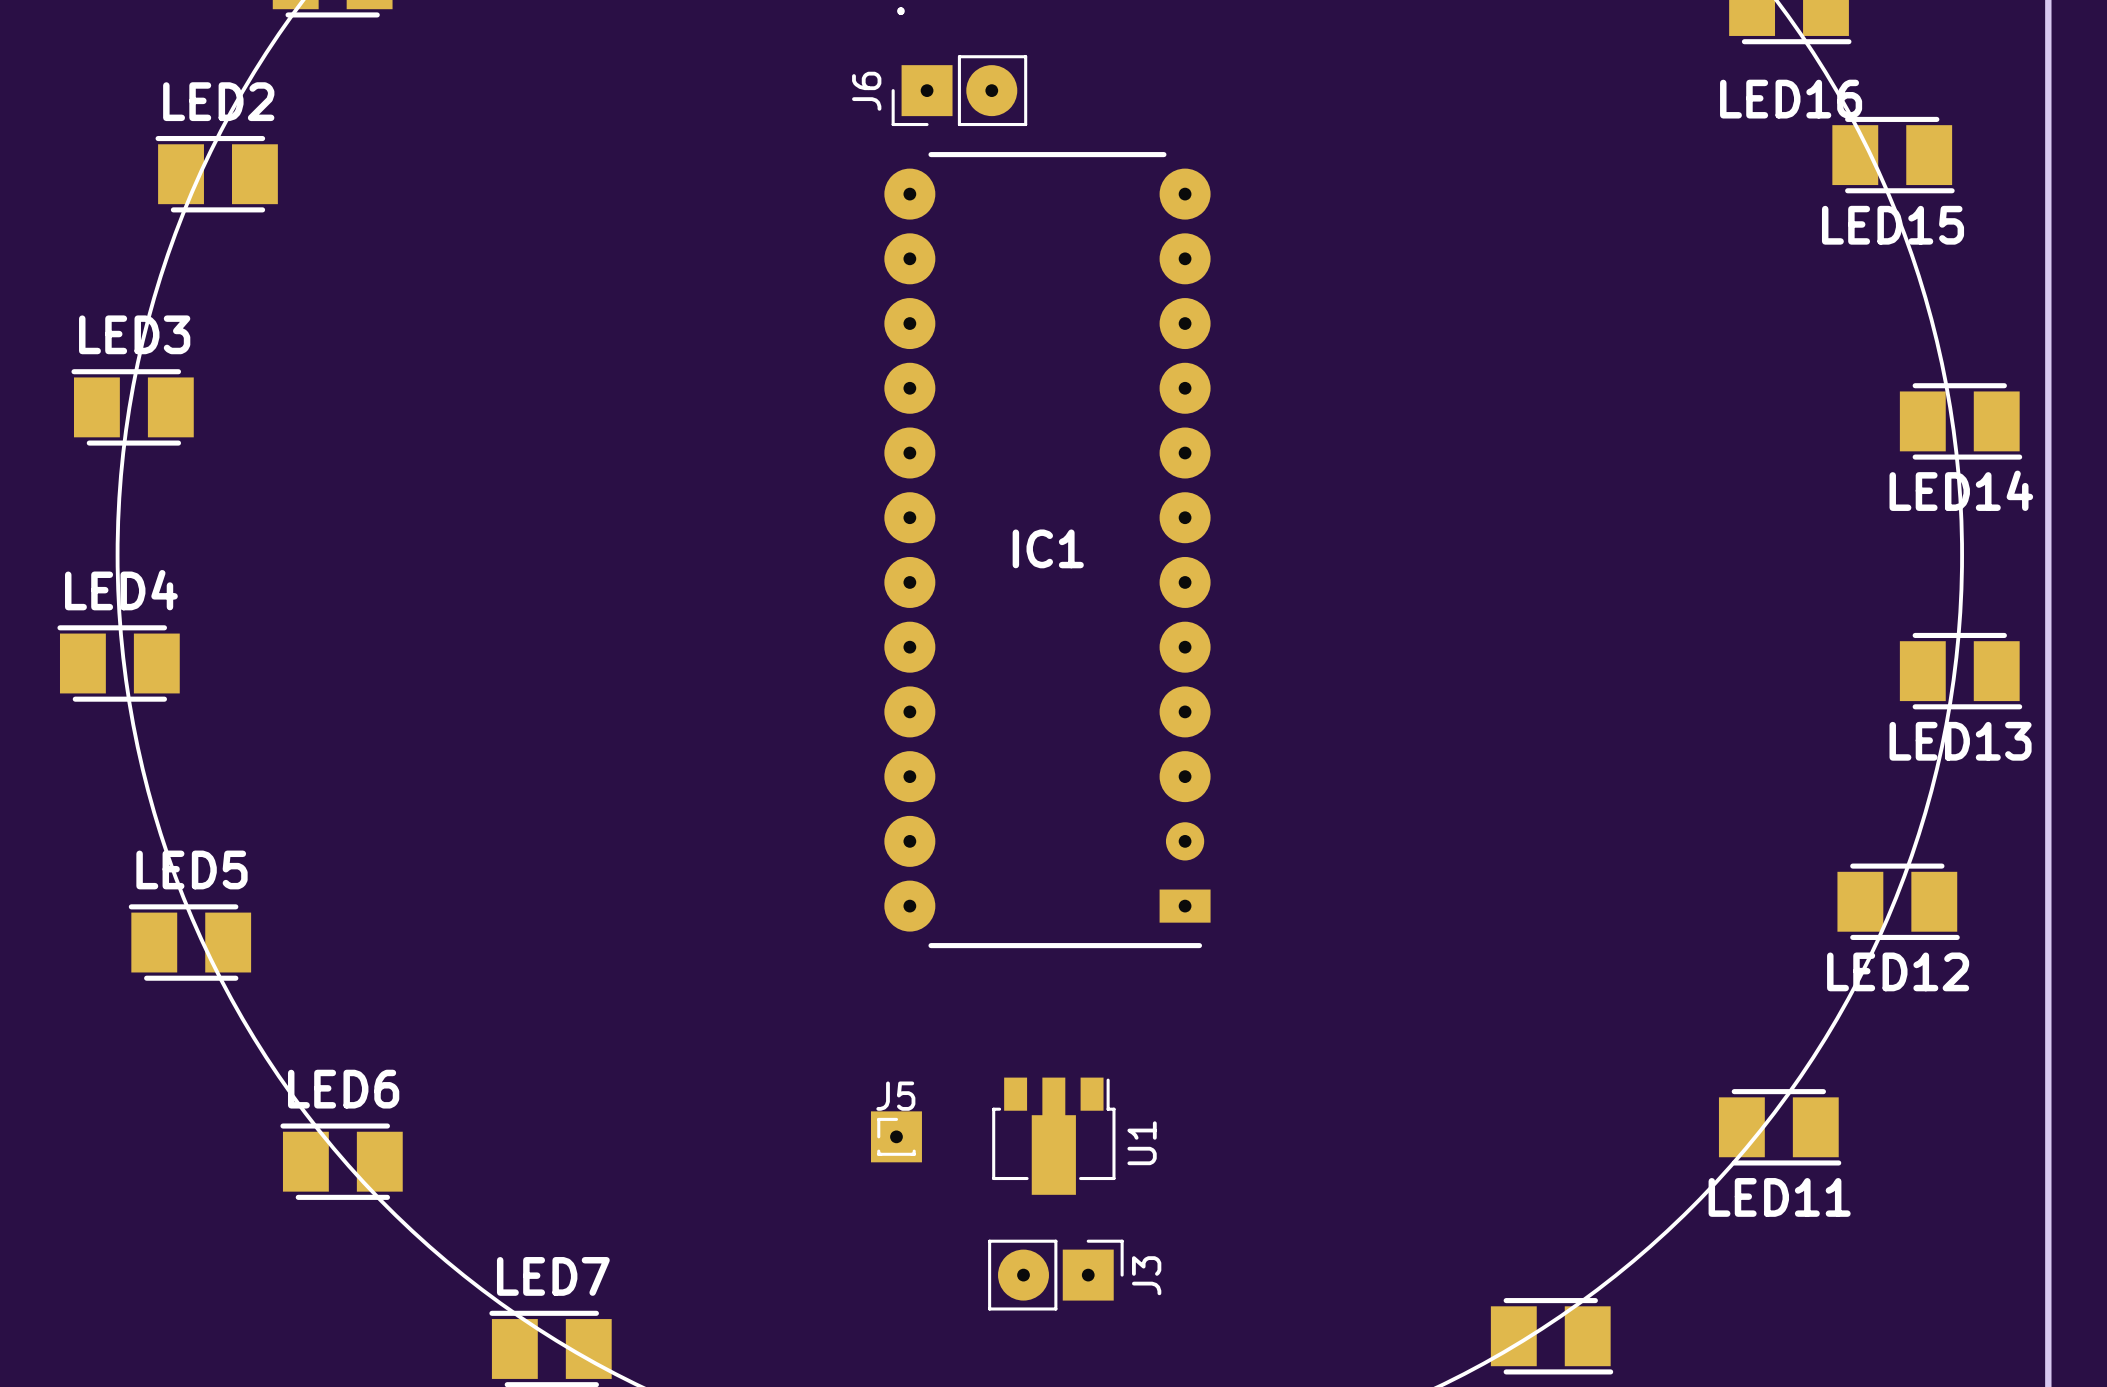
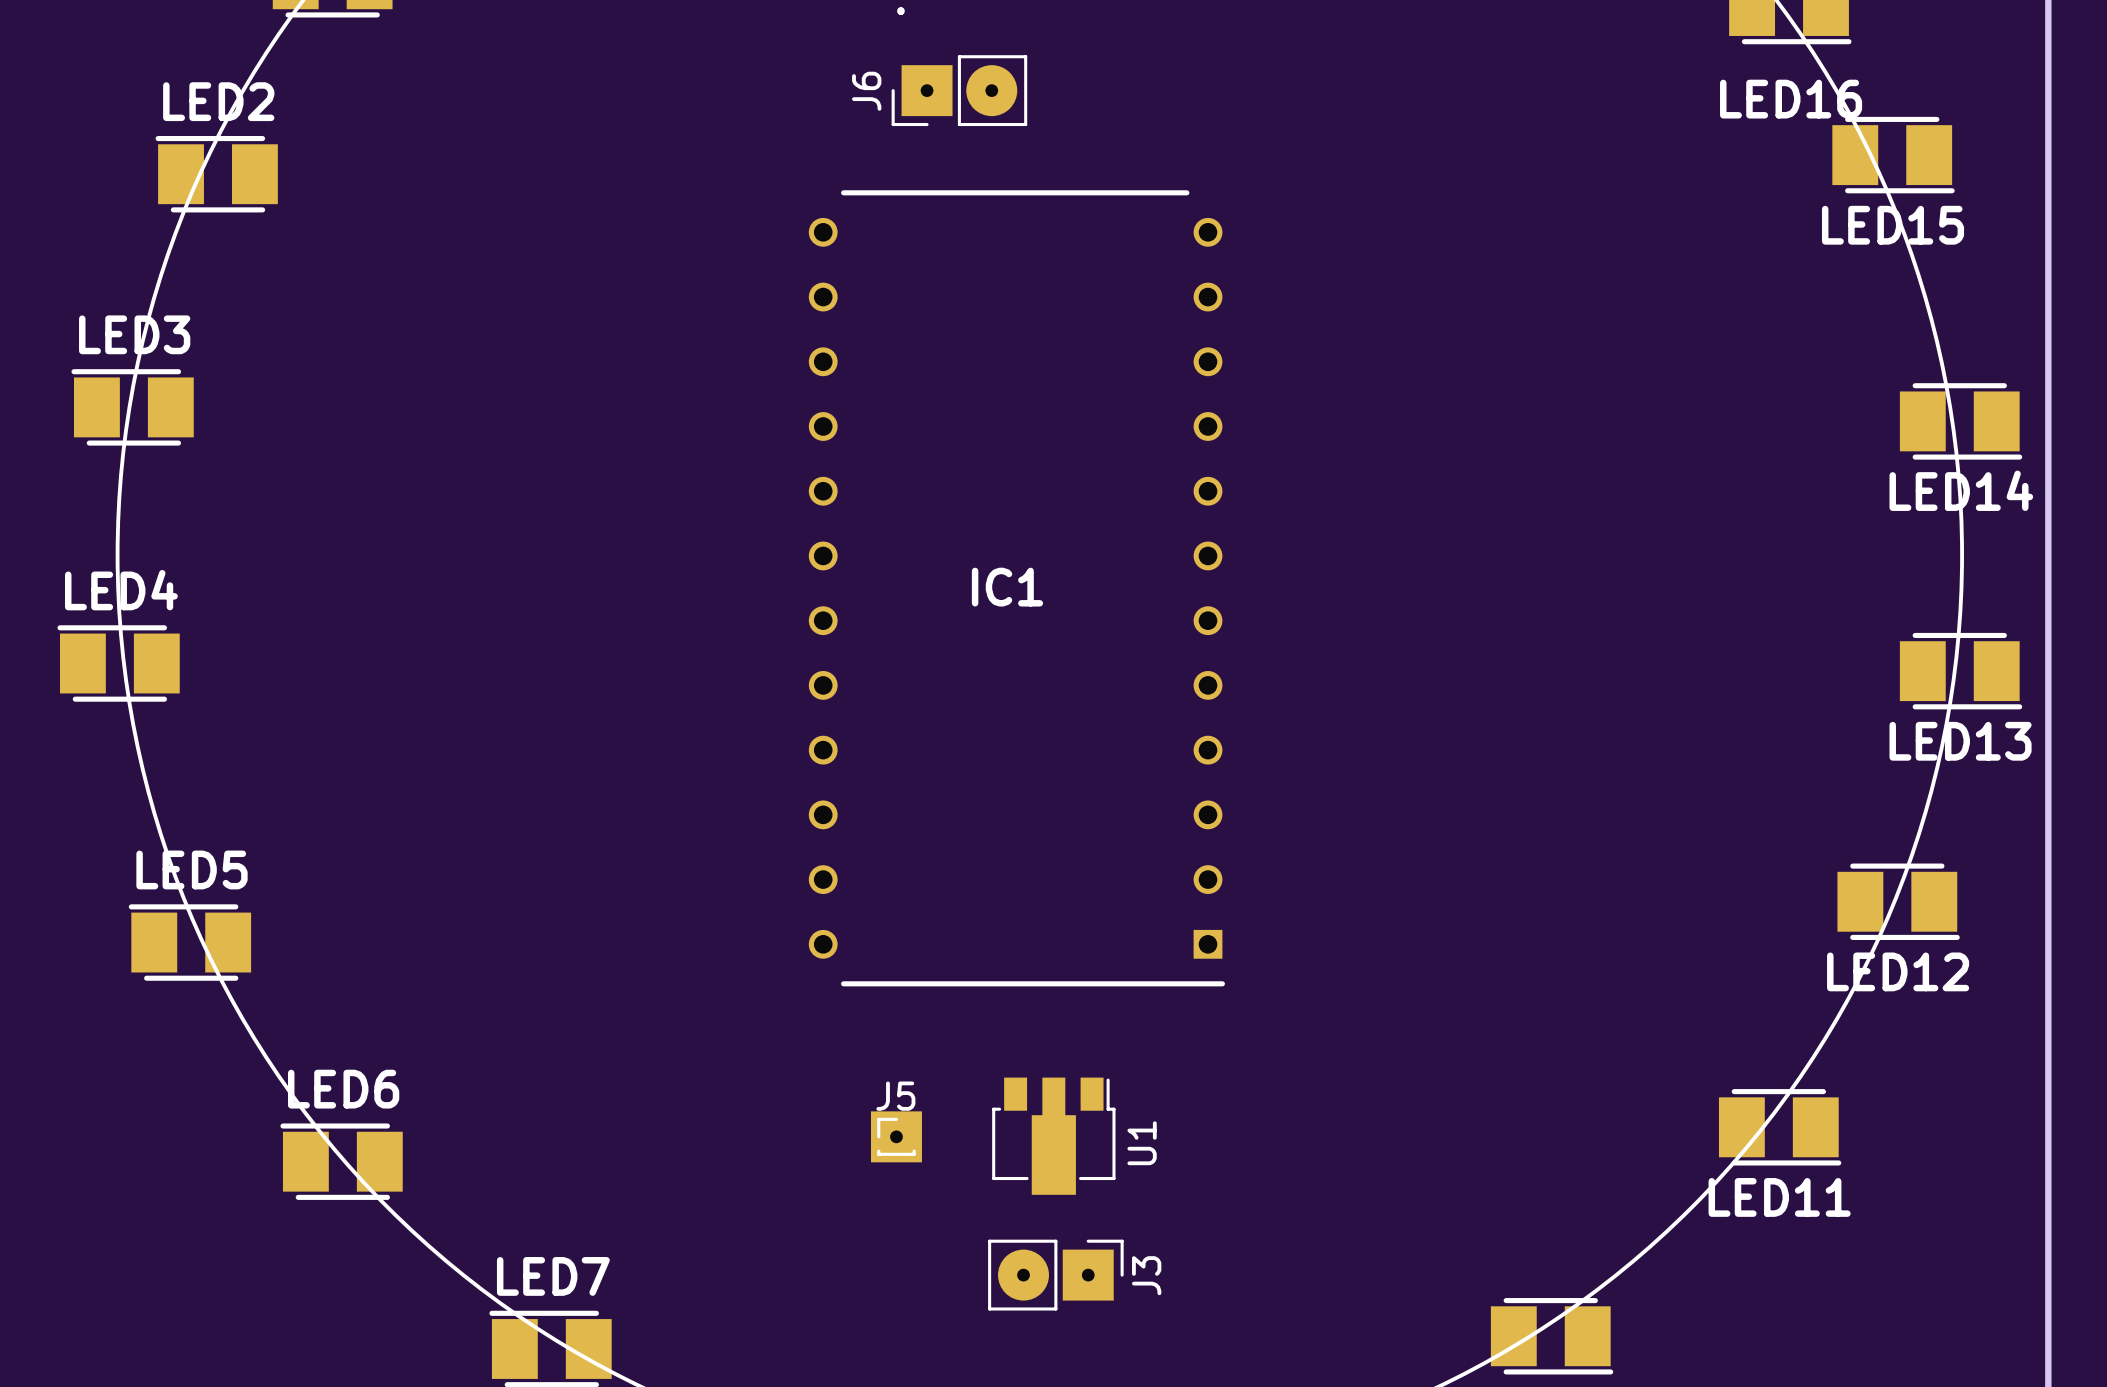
IC1 footprint: [884, 152, 1211, 949] -> [808, 190, 1225, 987]

